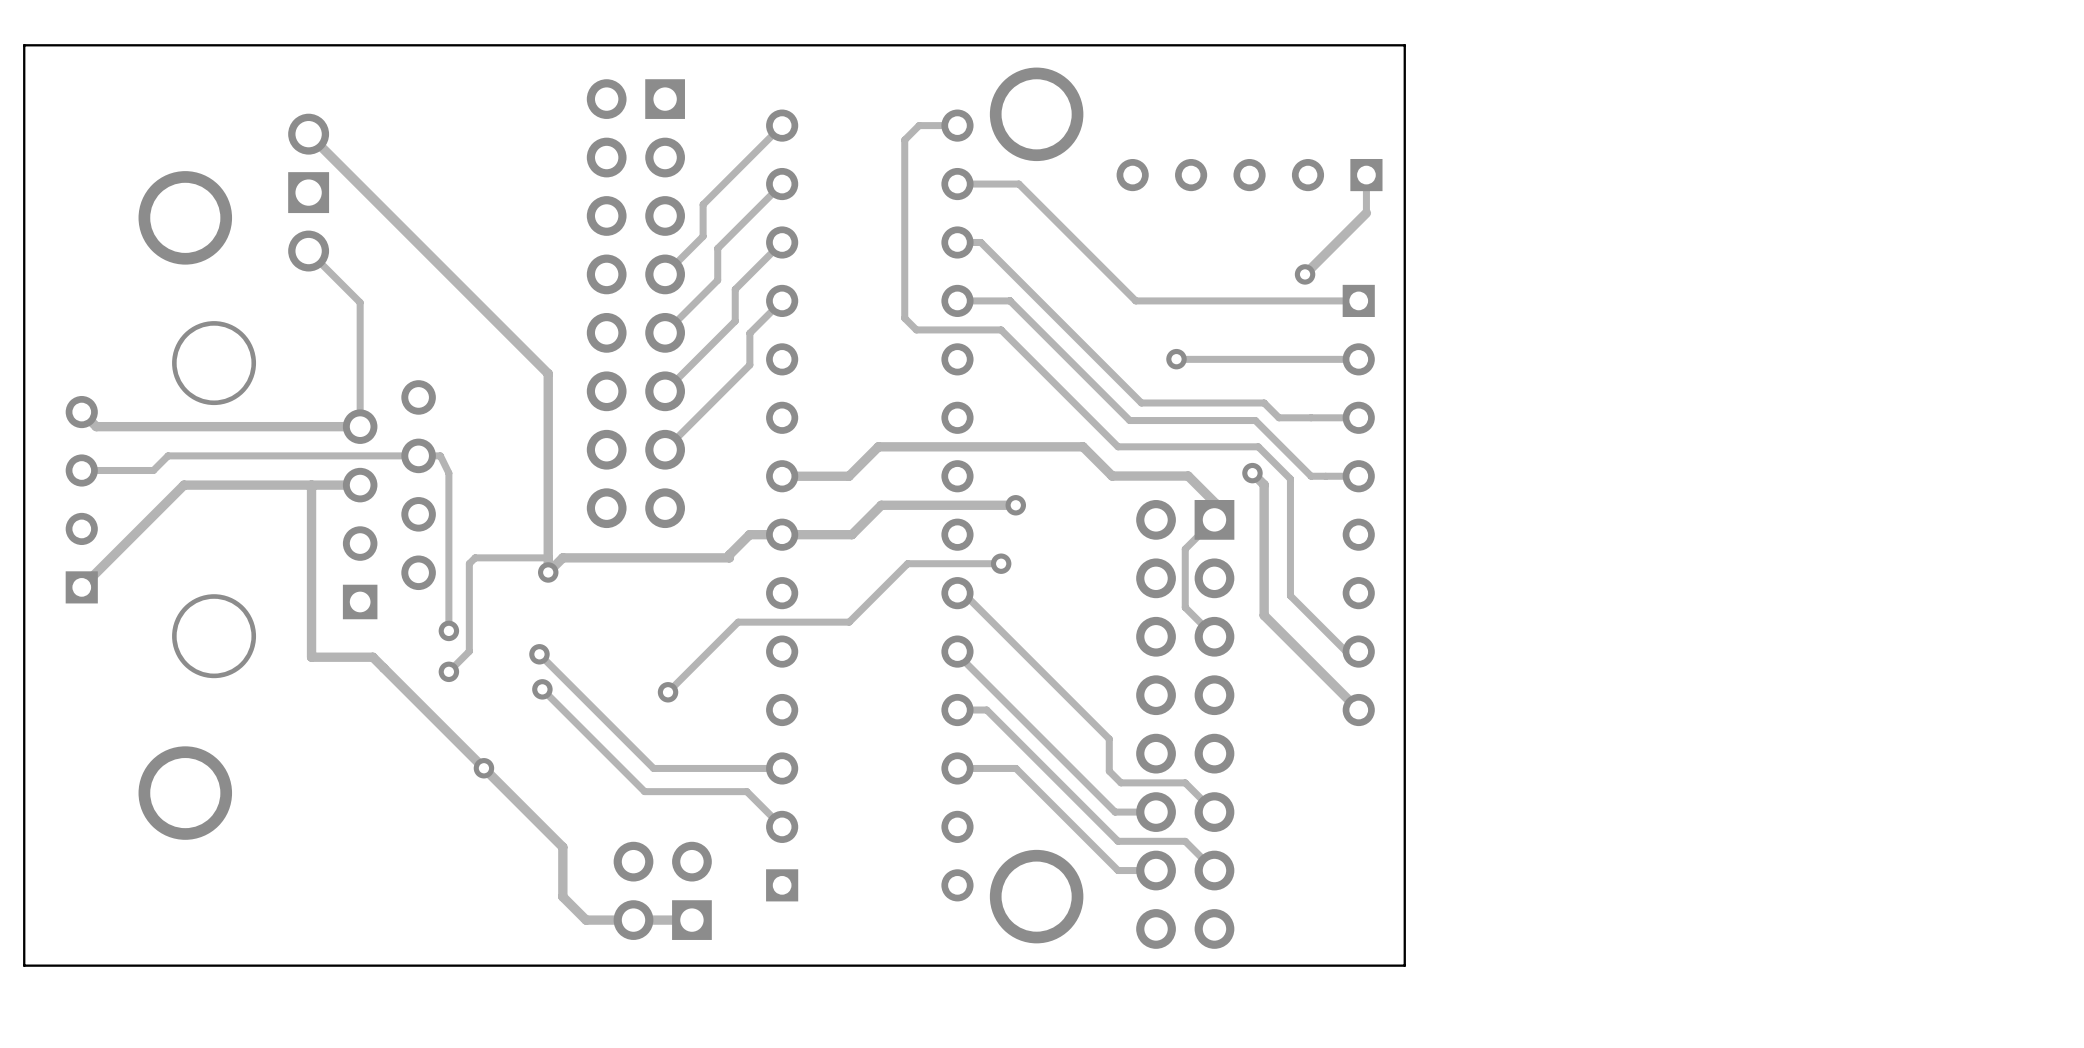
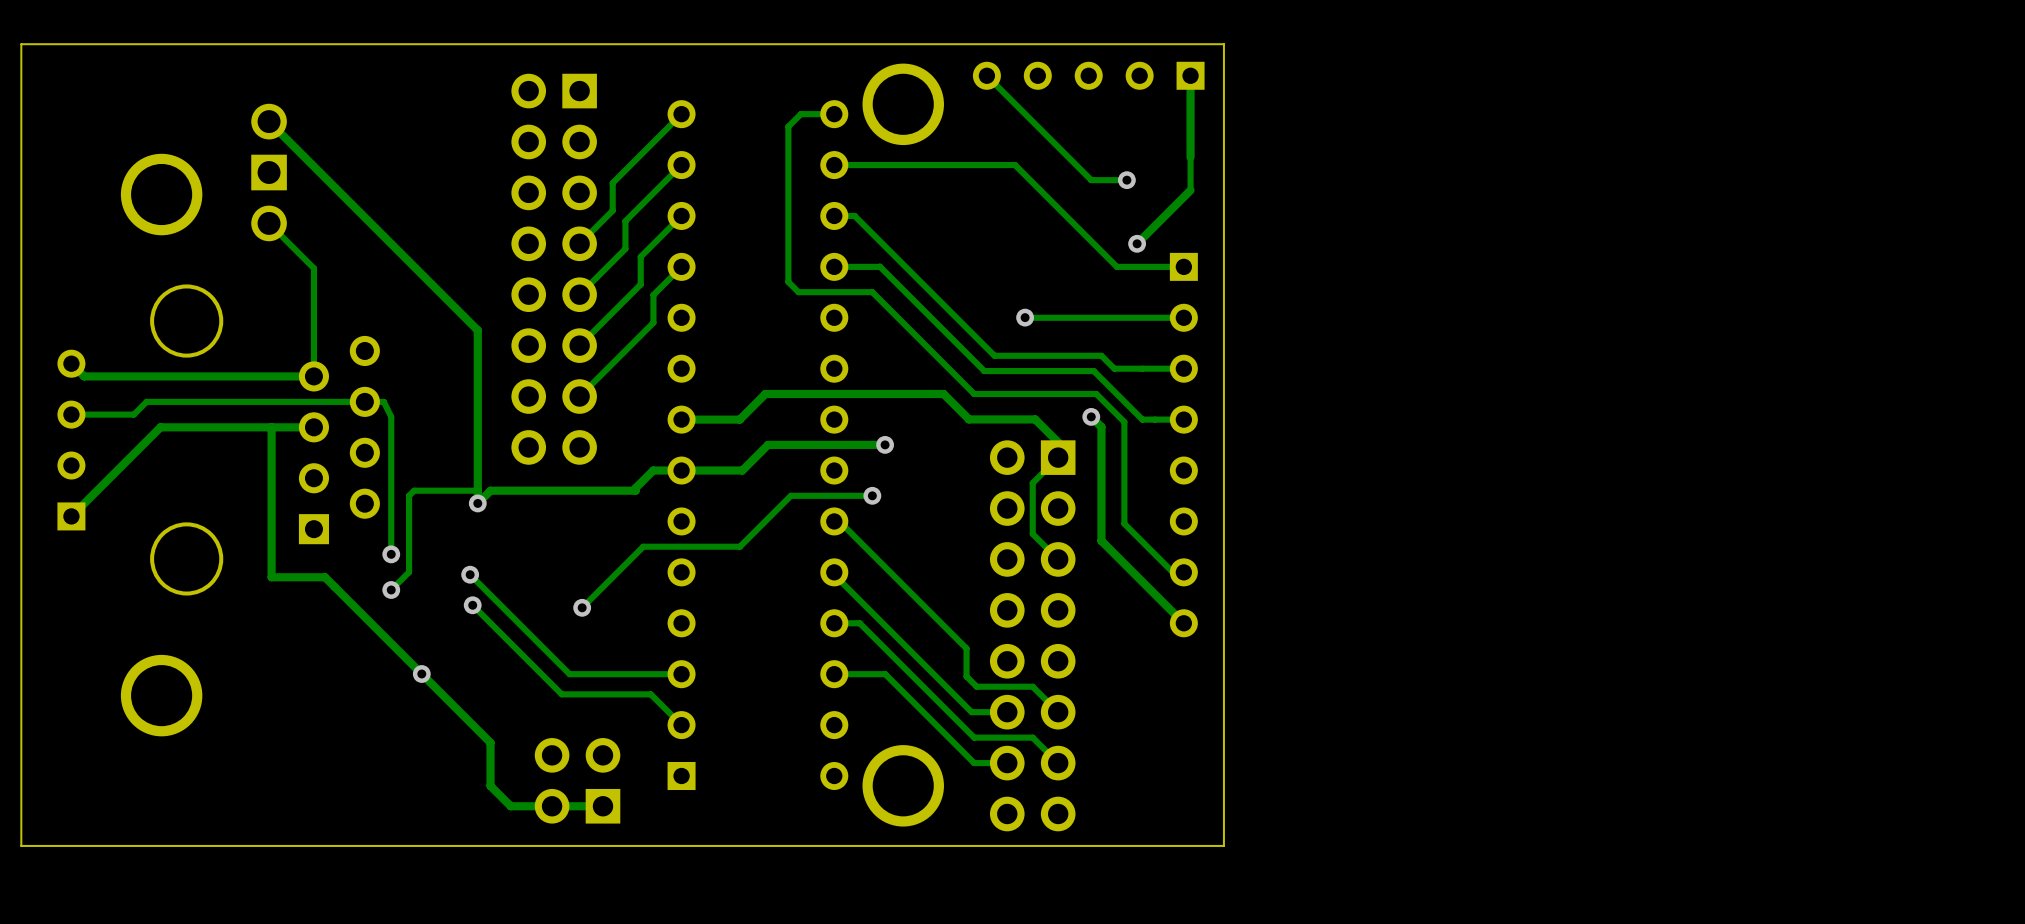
track: none -> (986, 75) (1091, 180) (1126, 180)
track: none -> (1190, 75) (1190, 157)
part position: (1249, 175) -> (1088, 75)
track: (1018, 184) (1135, 300) (1281, 300) -> (887, 165) (1015, 165) (1116, 266)
via: none -> (1126, 180)

